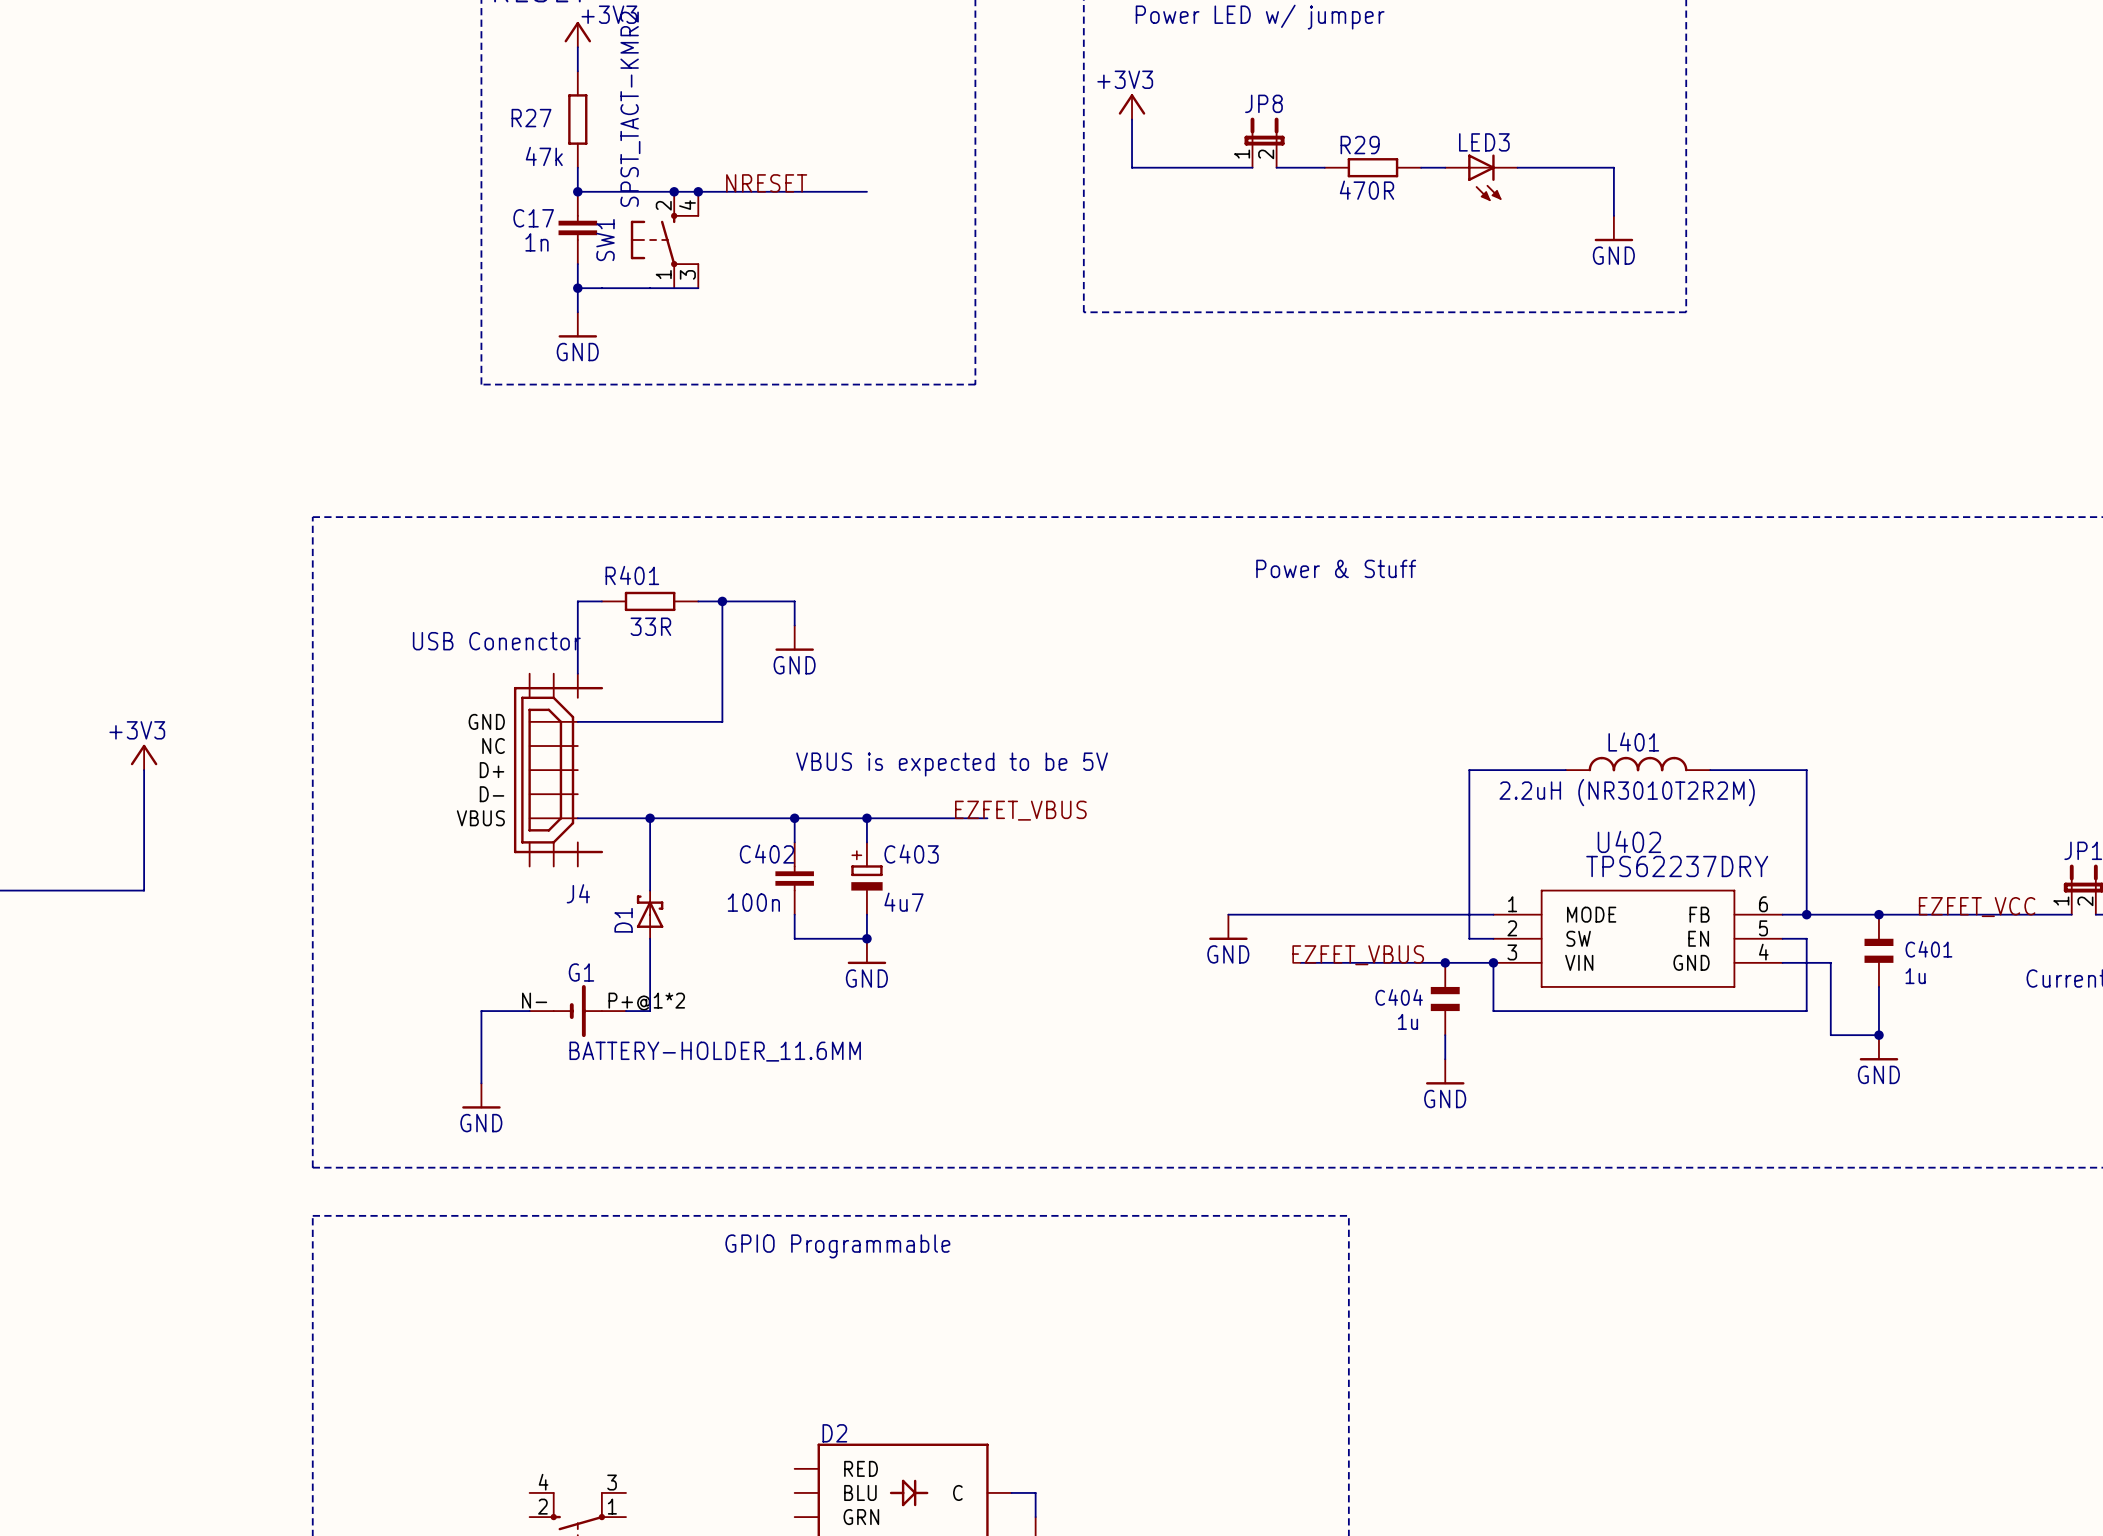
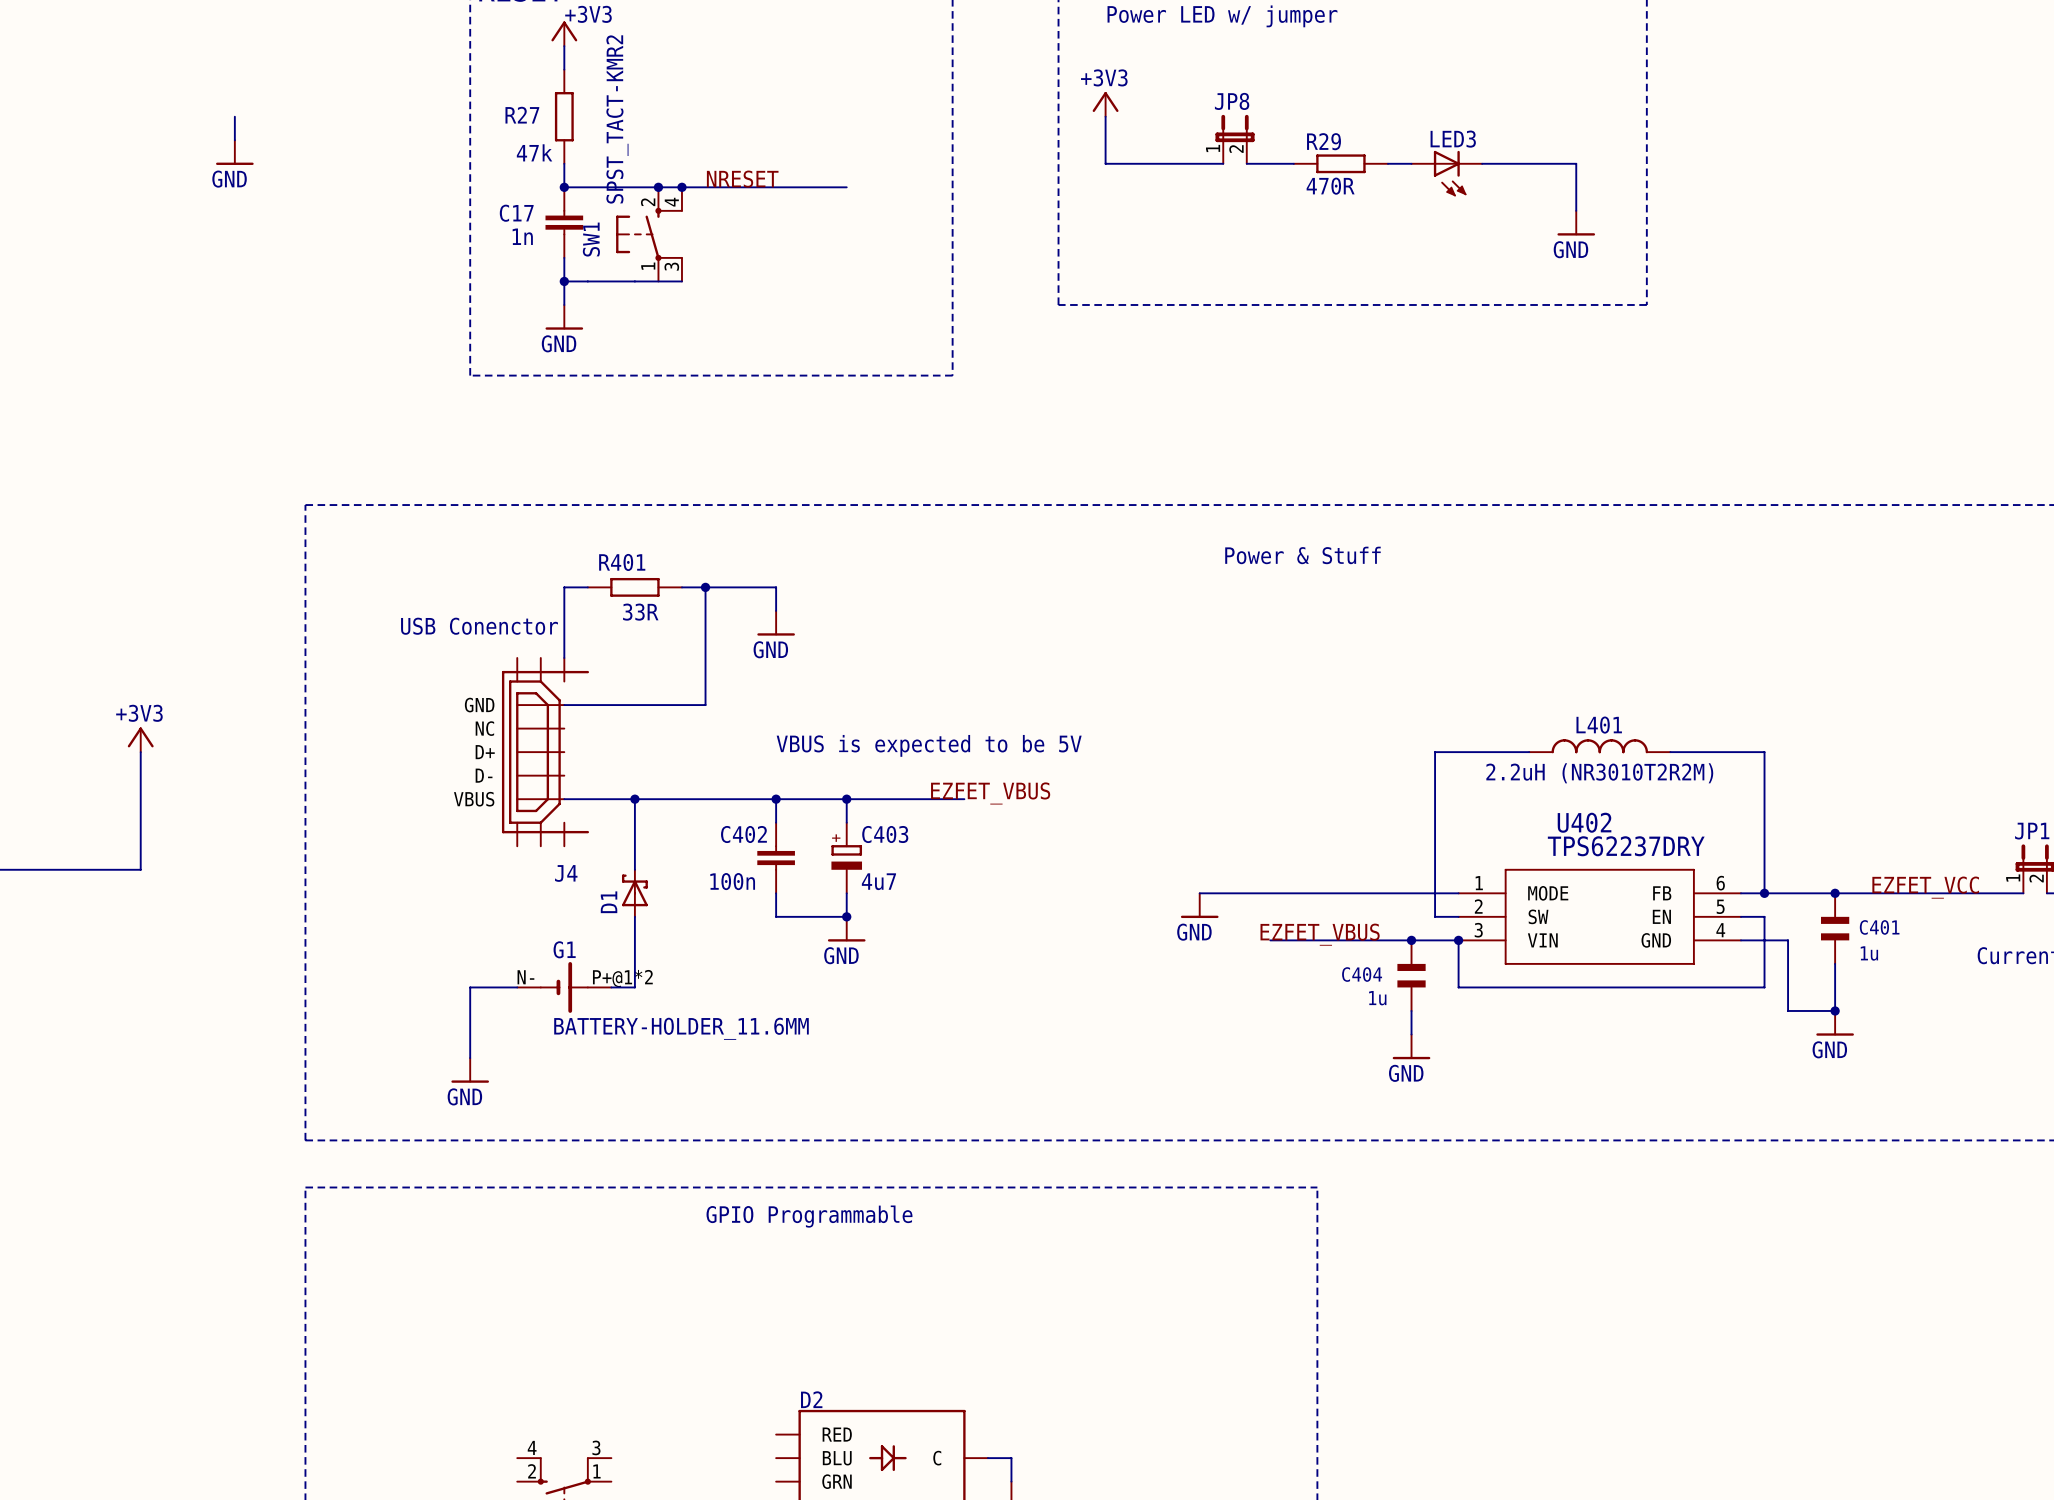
wire: none -> (234, 116) (234, 140)
power symbol: none -> GND (234, 152)

